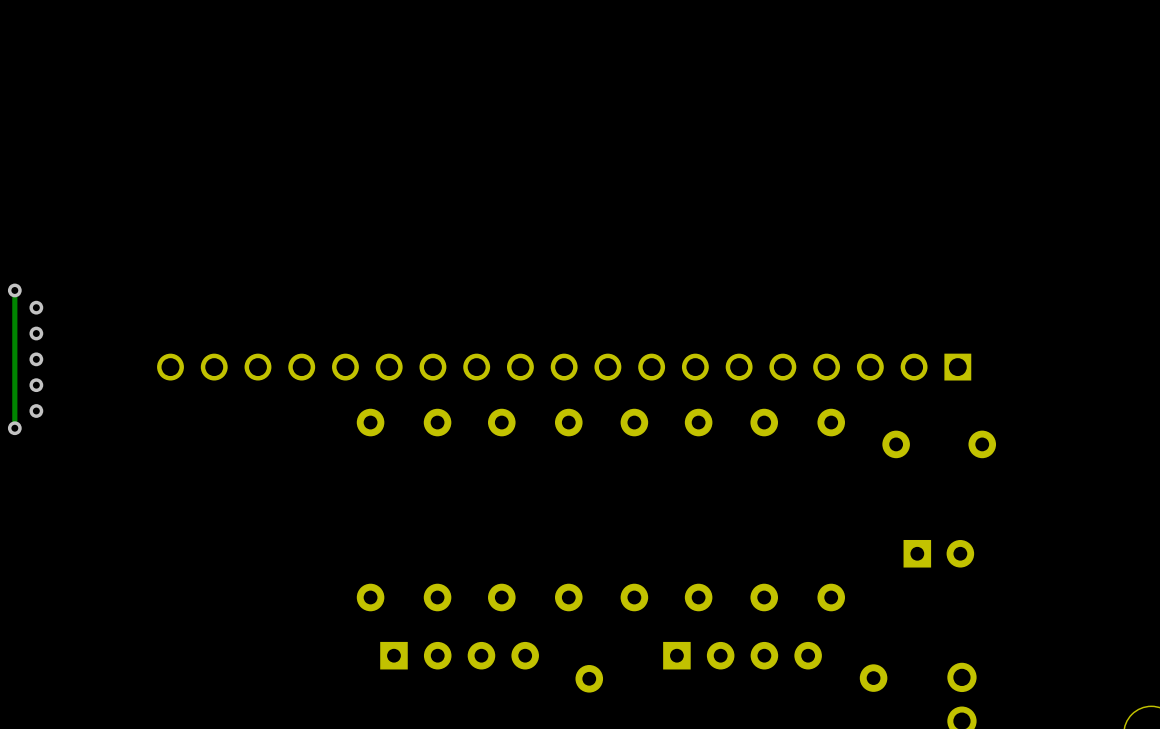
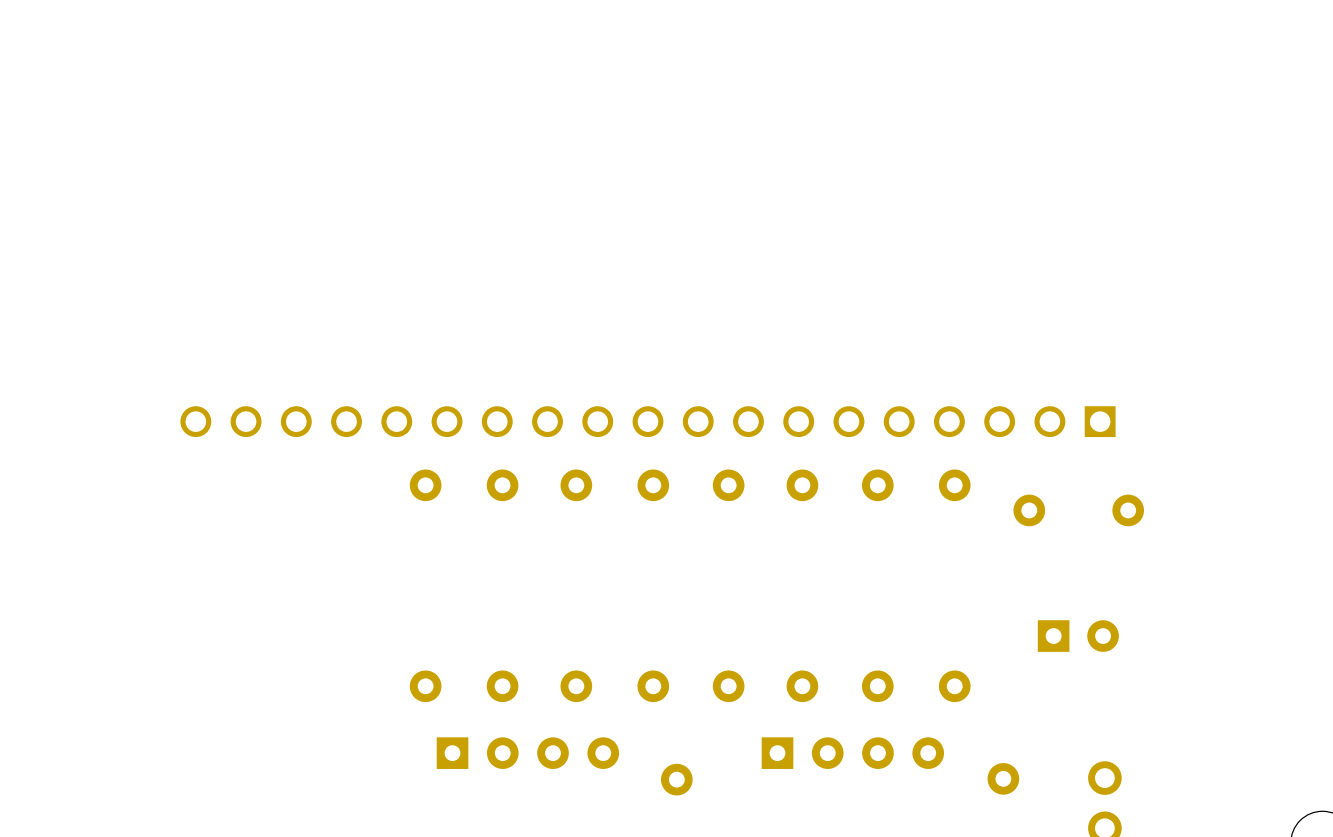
track: (14, 290) (14, 428) -> none
via: (14, 290) -> none
via: (36, 307) -> none
via: (36, 333) -> none
via: (36, 359) -> none
via: (36, 385) -> none
via: (36, 411) -> none
via: (14, 428) -> none

